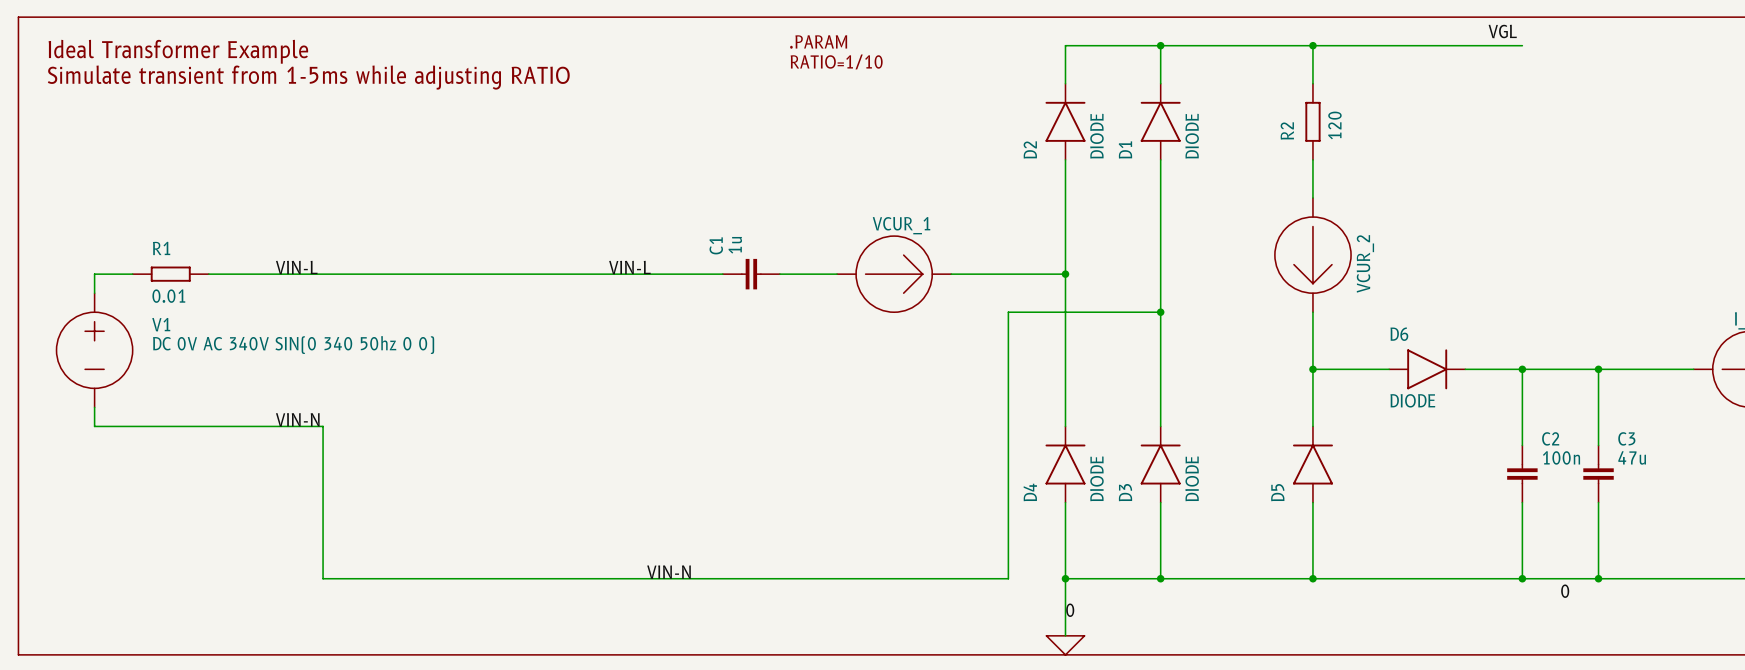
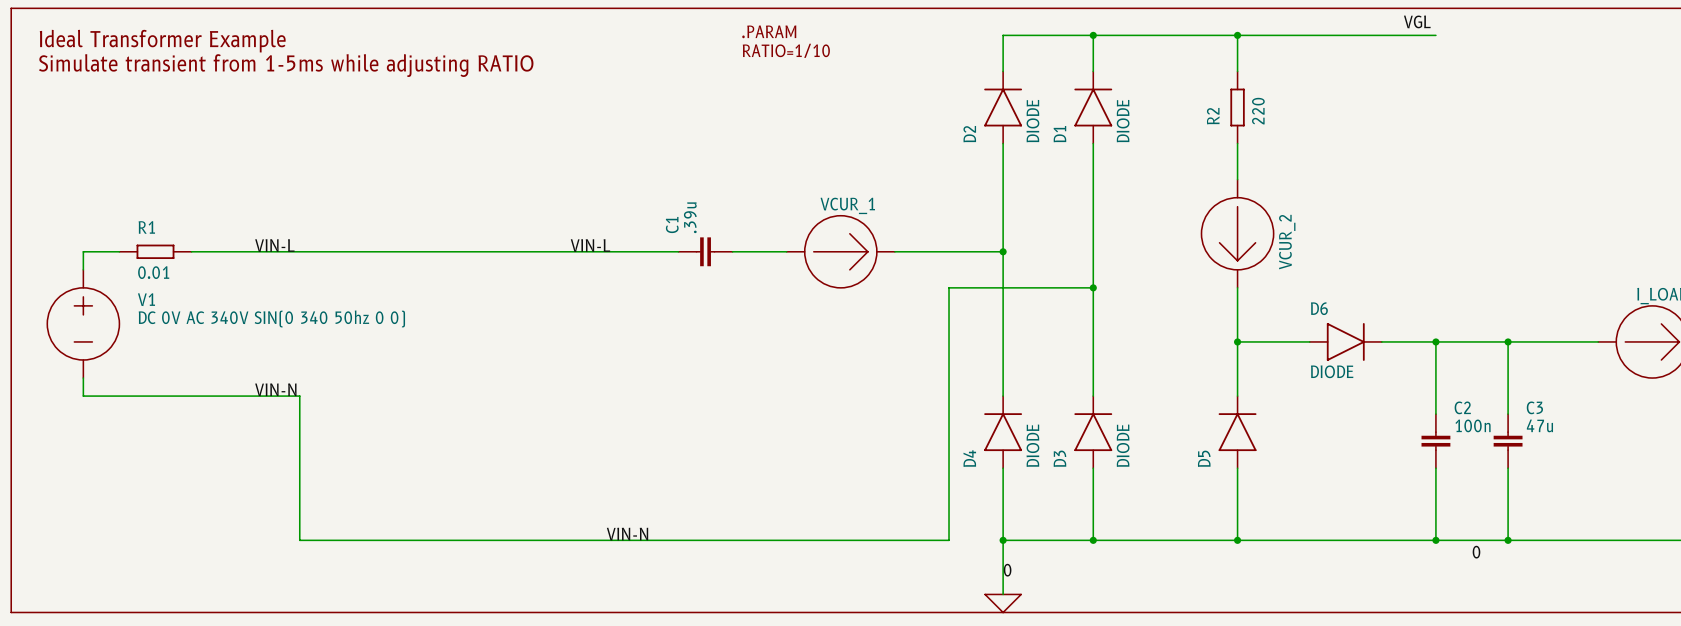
R2 value: 120 (1334, 125) -> 220 (1258, 111)
C1 value: 1u (735, 245) -> .39u (690, 217)

